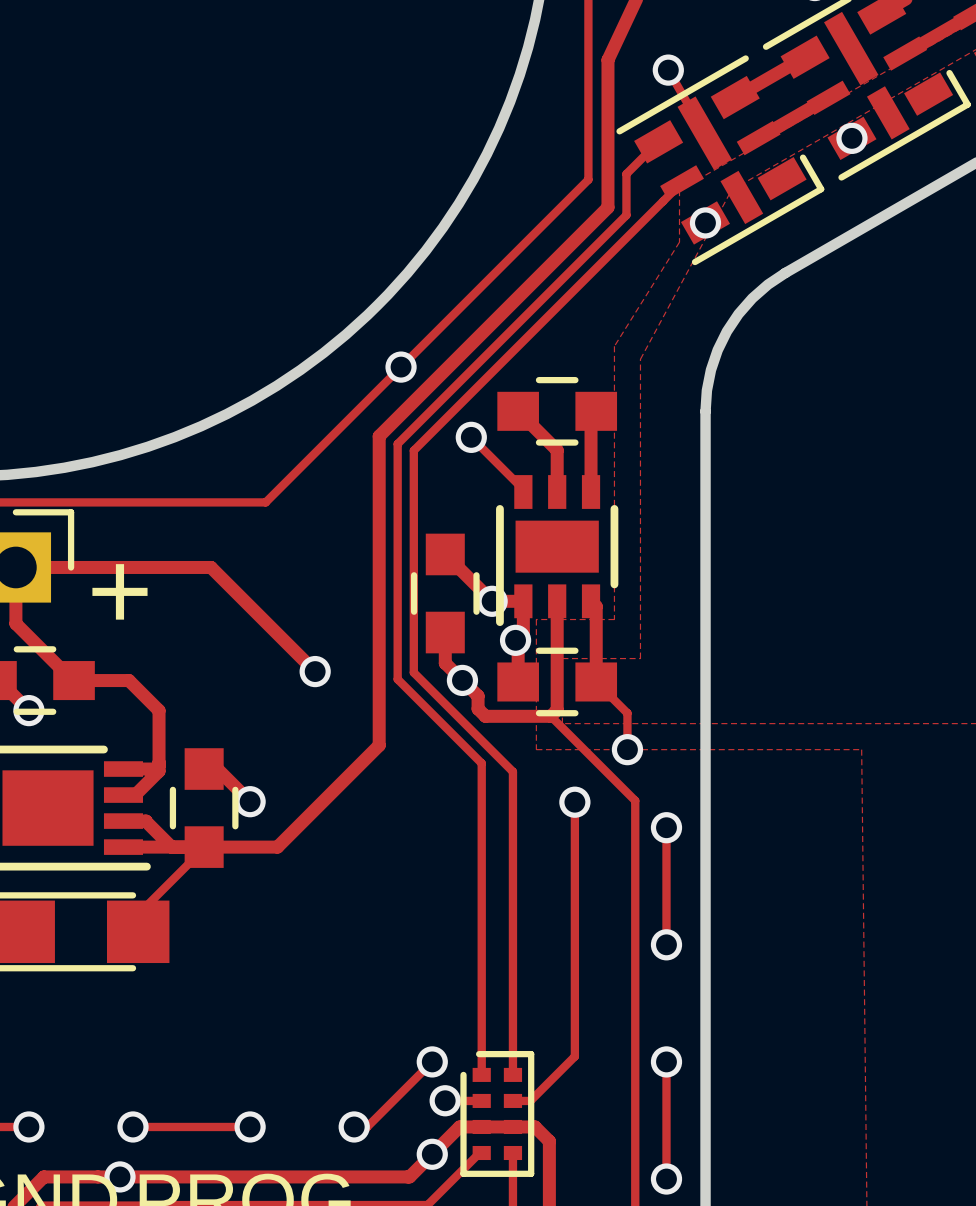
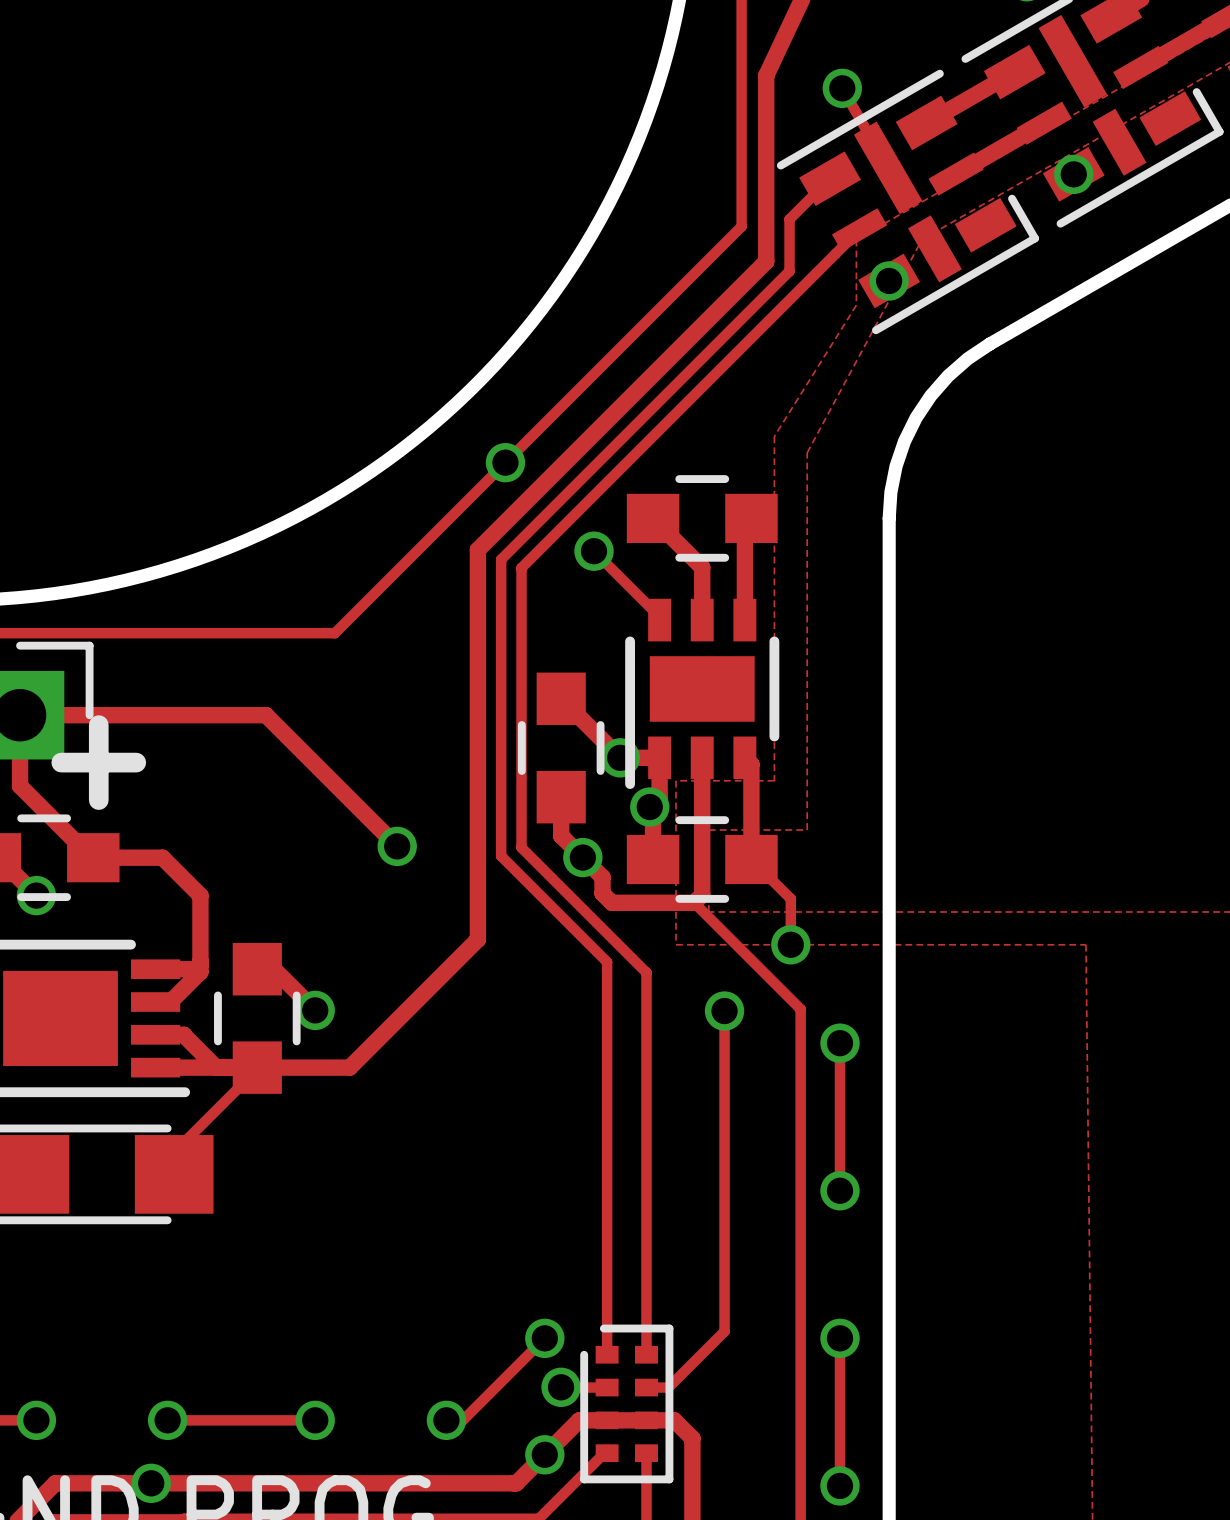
text position: + (119, 591) -> + (98, 762)

